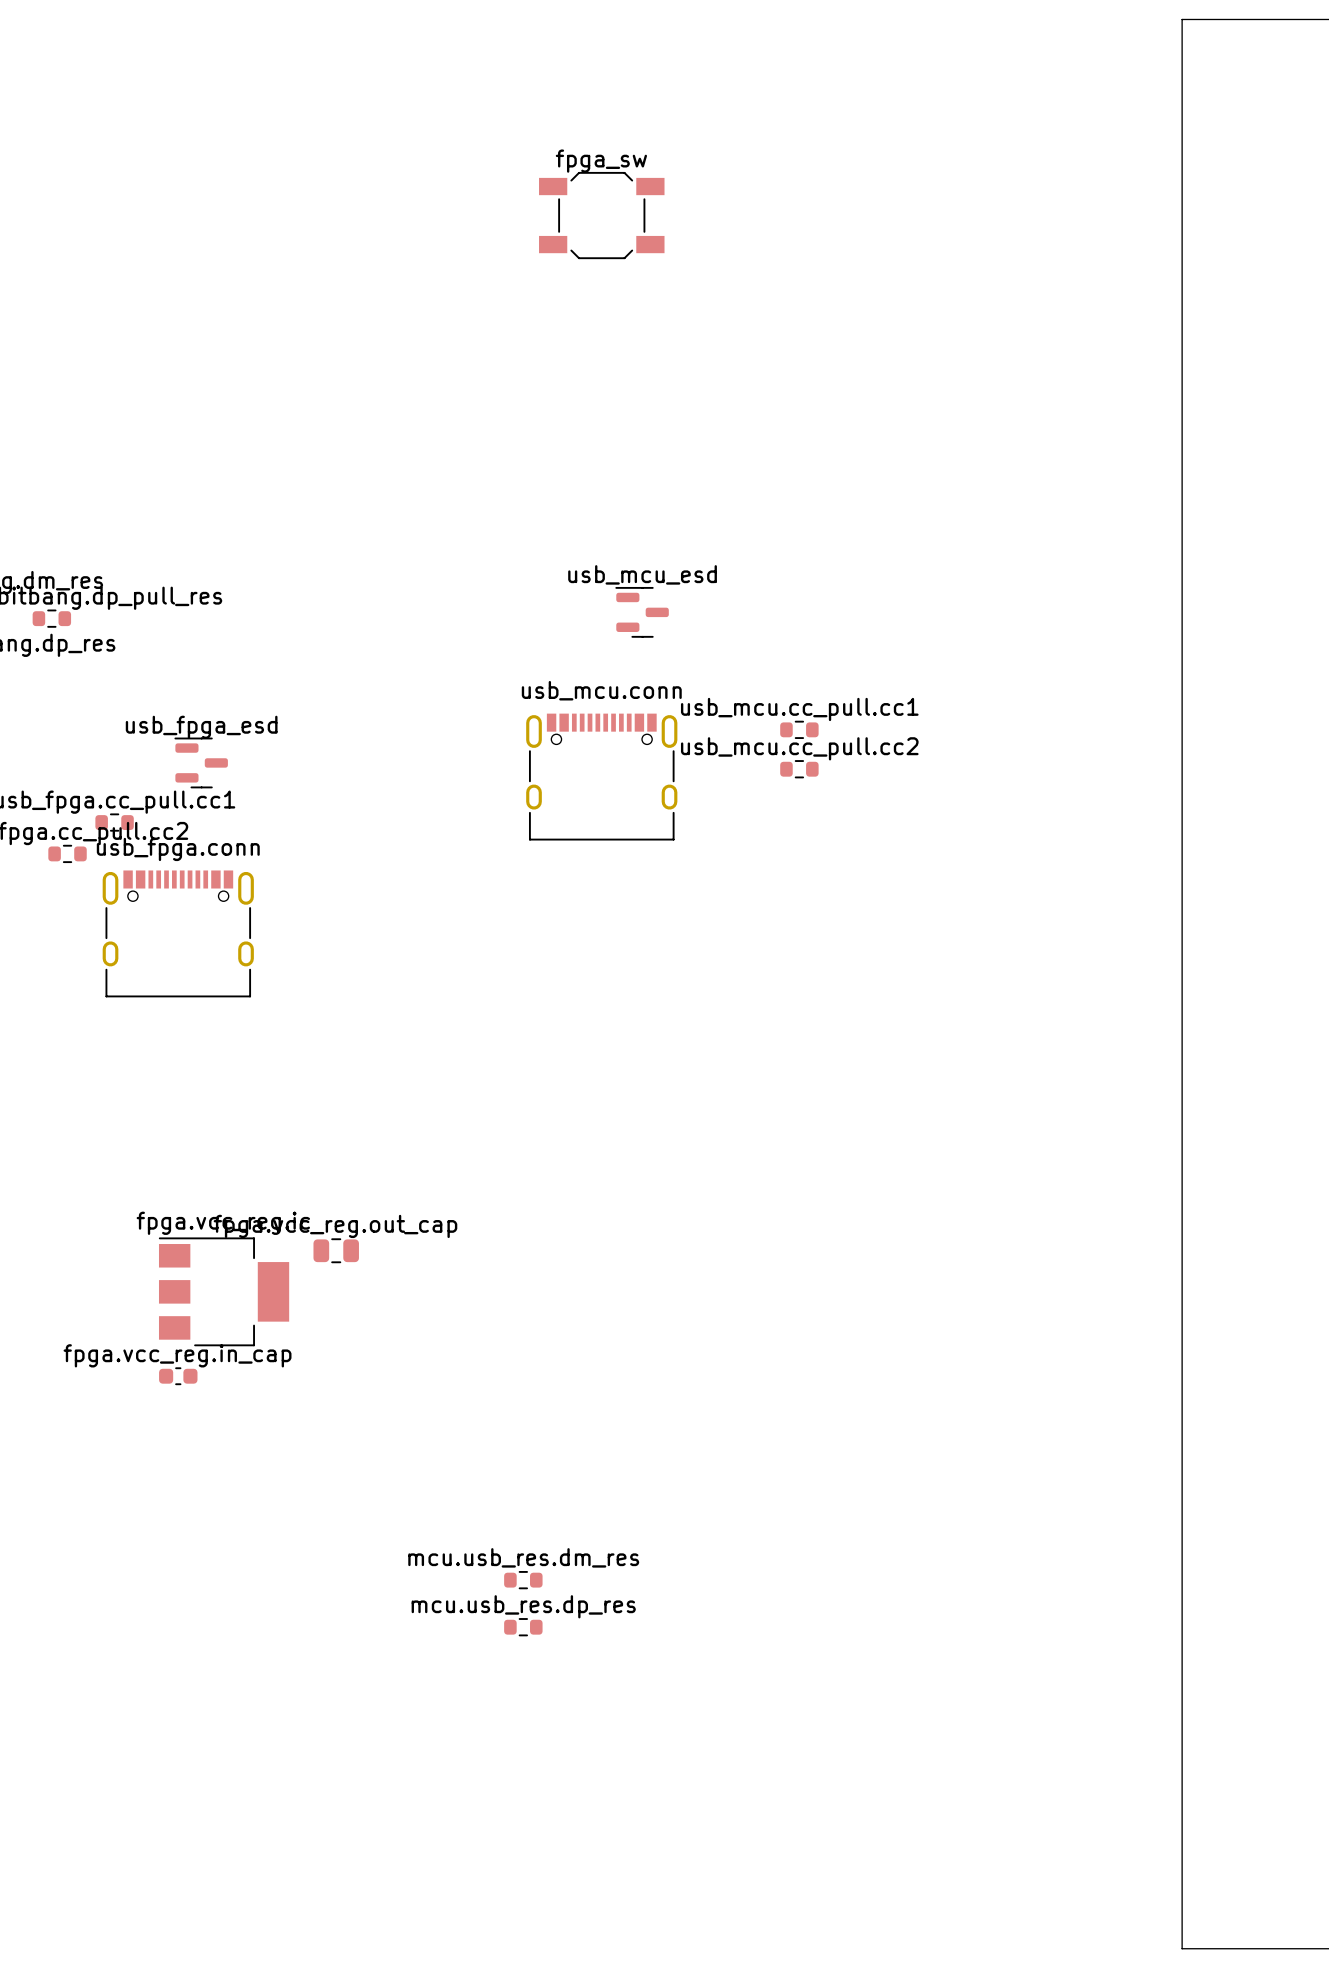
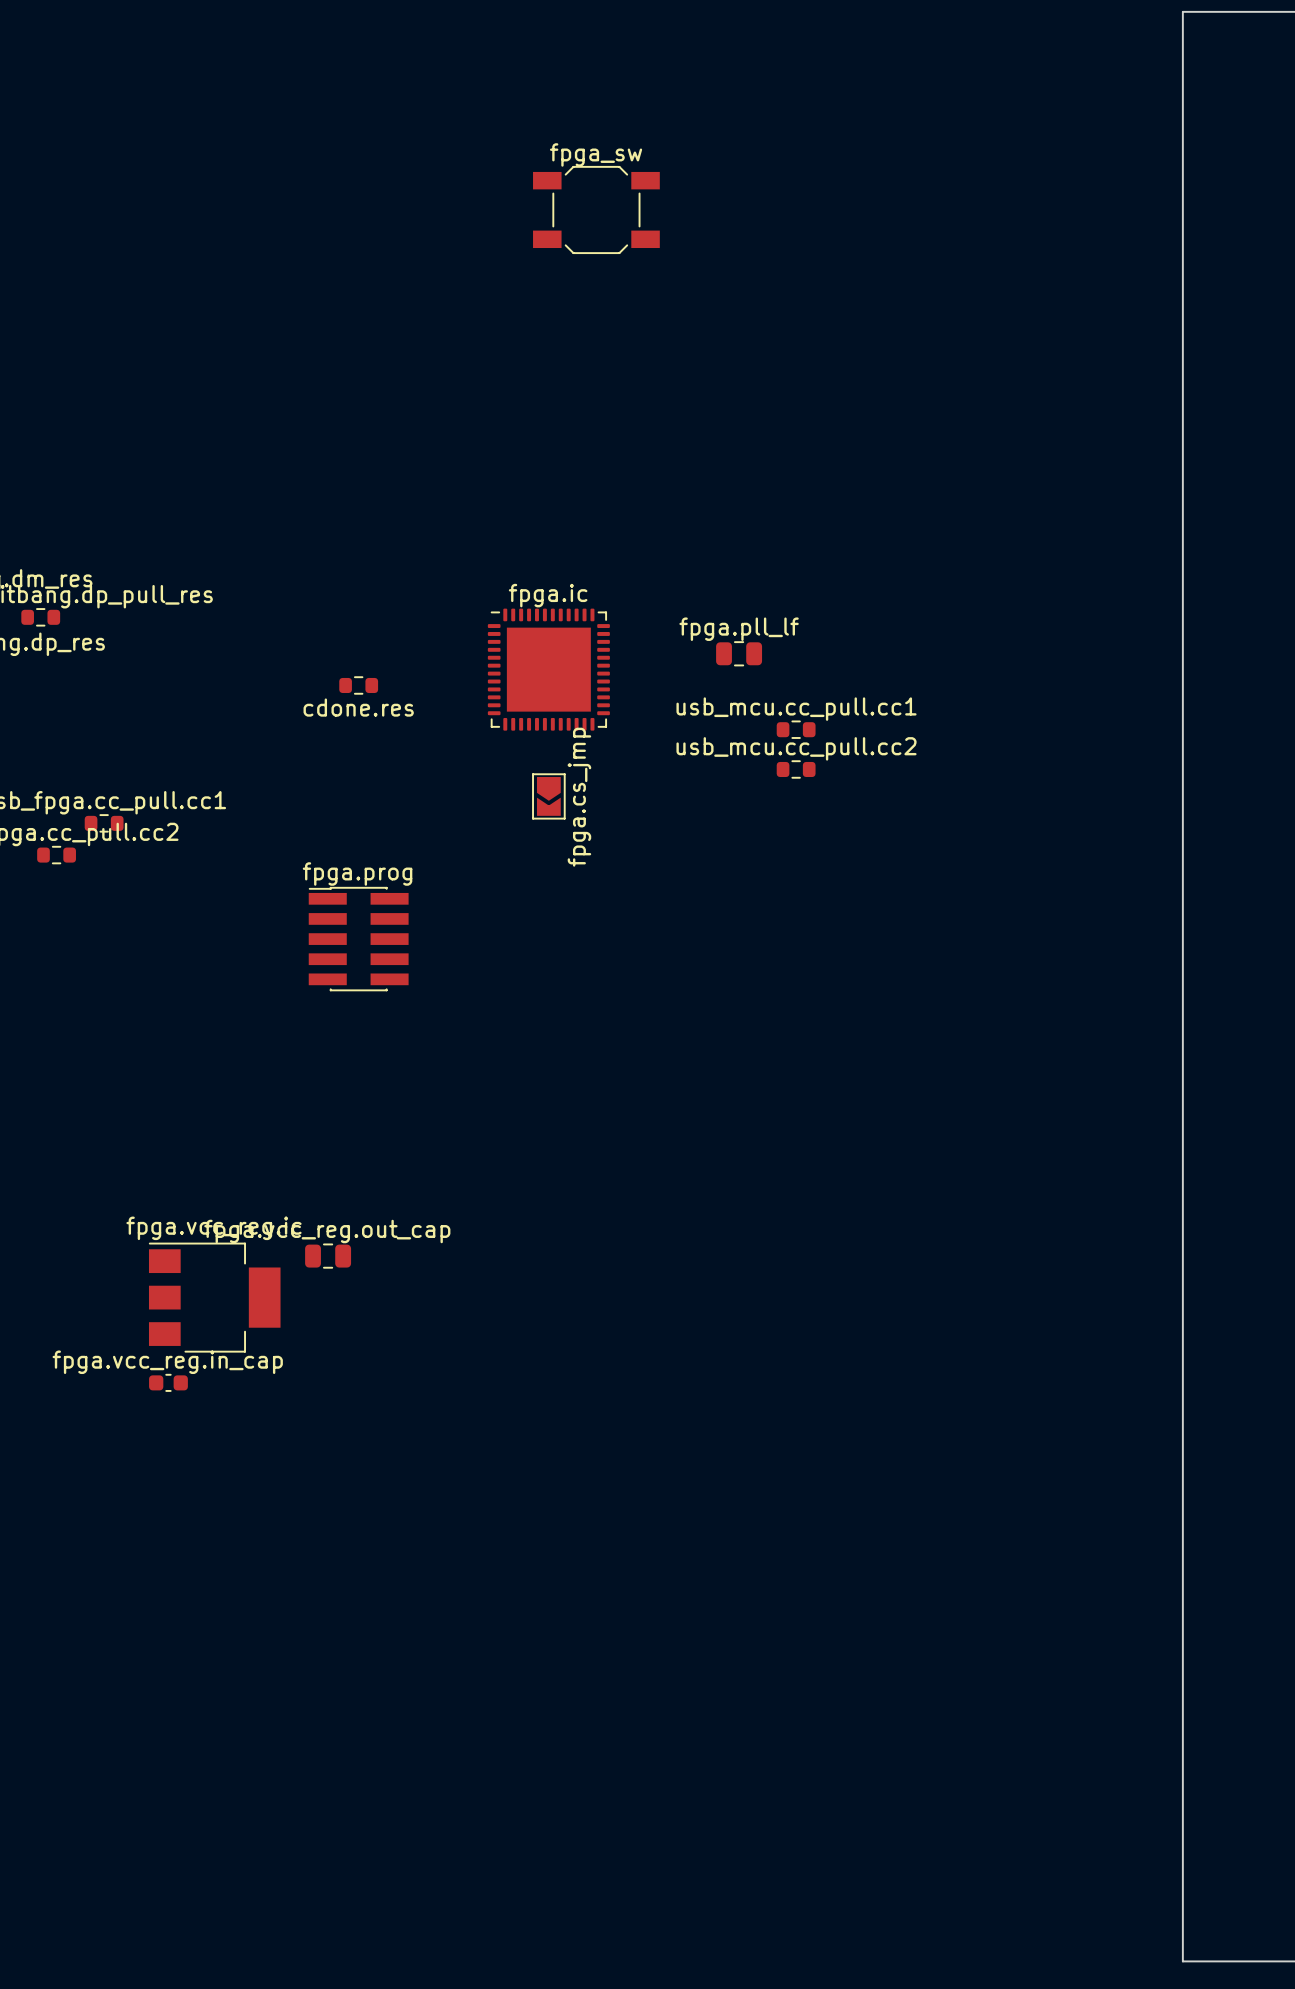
usb_mcu_esd: (642, 612) -> none
fpga.pll_lf: none -> (739, 653)
fpga.ic: none -> (548, 669)
cdone.res: none -> (358, 685)
usb_fpga_esd: (201, 762) -> none
usb_mcu.conn: (601, 777) -> none
fpga.cs_jmp: none -> (548, 796)
usb_fpga.conn: (178, 933) -> none
fpga.prog: none -> (358, 939)
mcu.usb_res.dm_res: (523, 1580) -> none
mcu.usb_res.dp_res: (523, 1627) -> none

